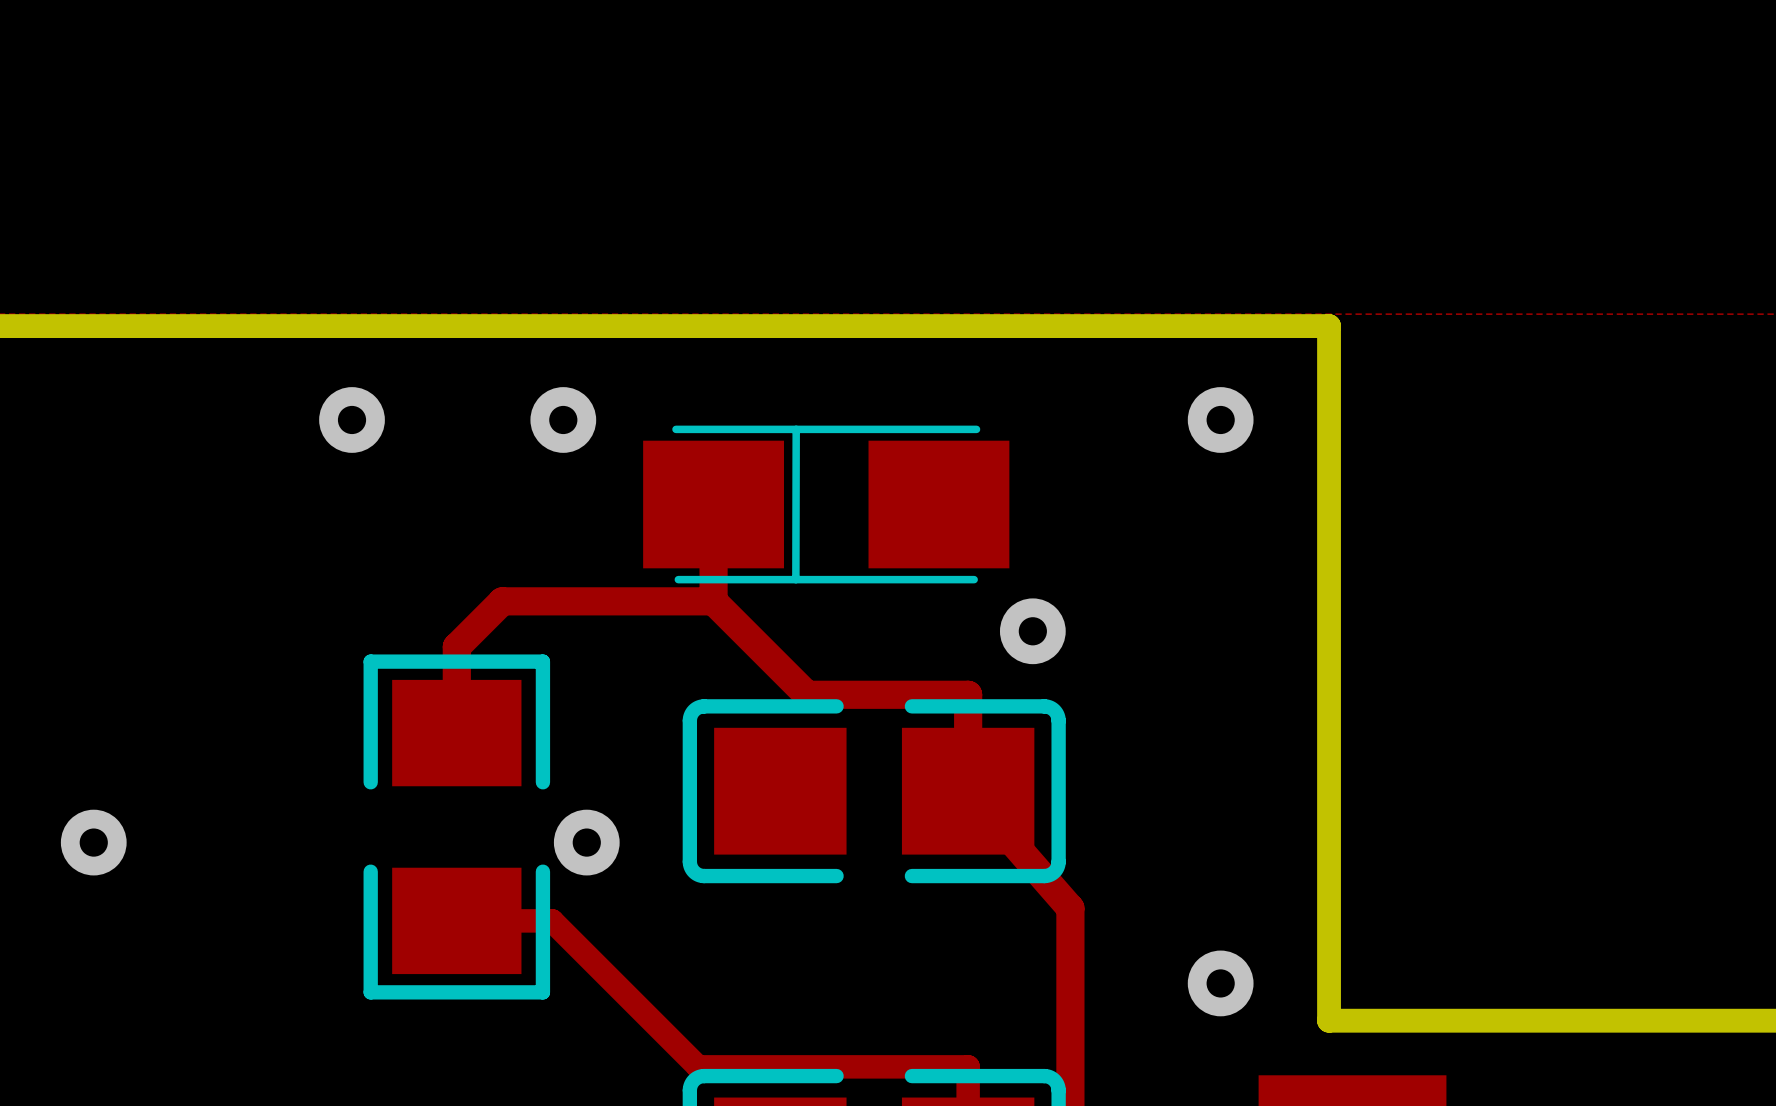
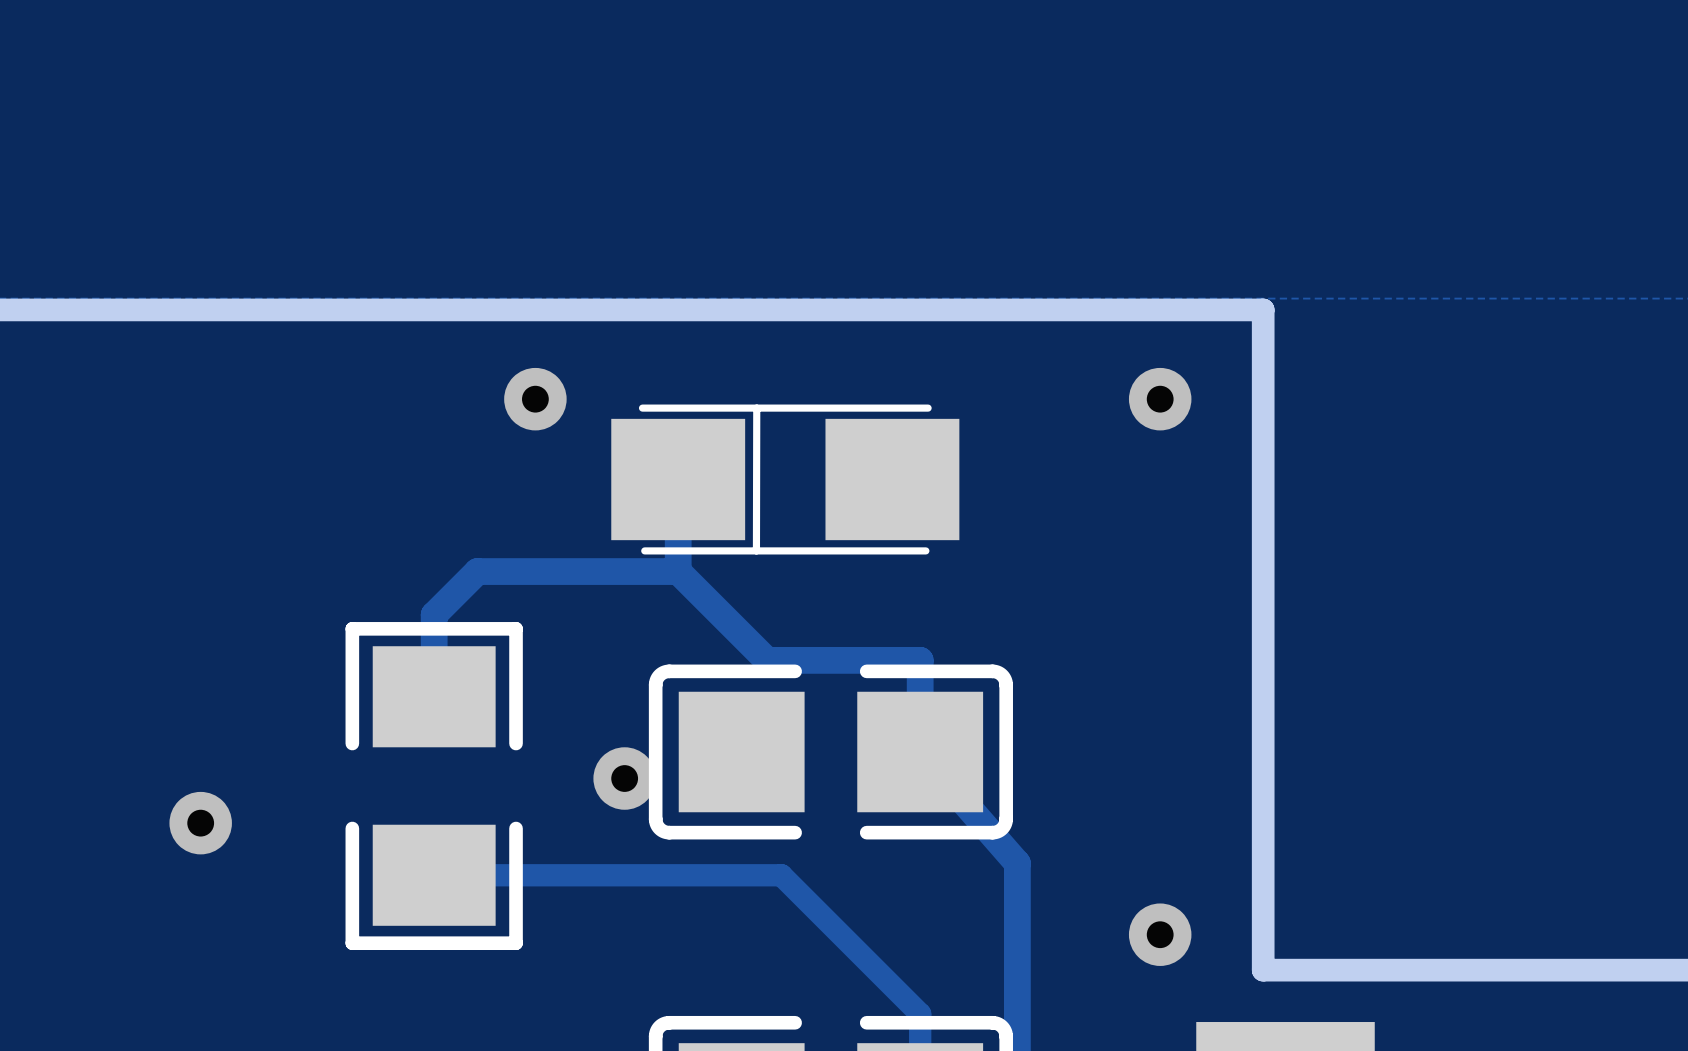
via: (352, 419) -> none
via: (1032, 631) -> none
via position: (93, 842) -> (200, 823)
via position: (586, 842) -> (624, 778)
track: (552, 920) (698, 1066) (968, 1066) -> (524, 875) (781, 875) (920, 1014)

